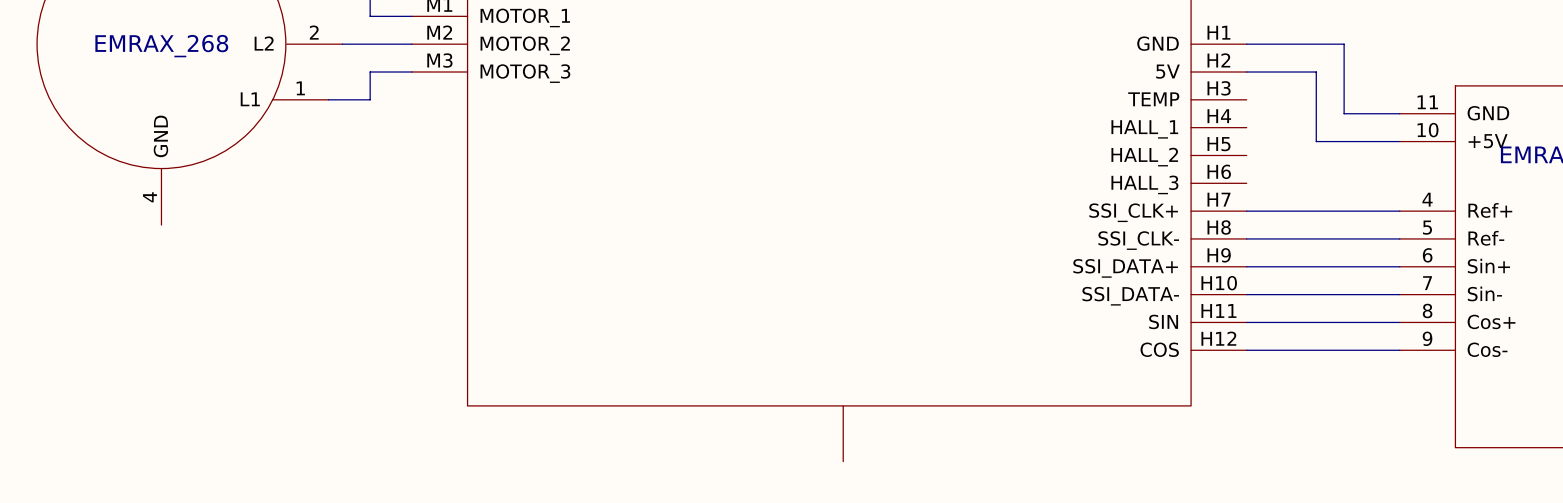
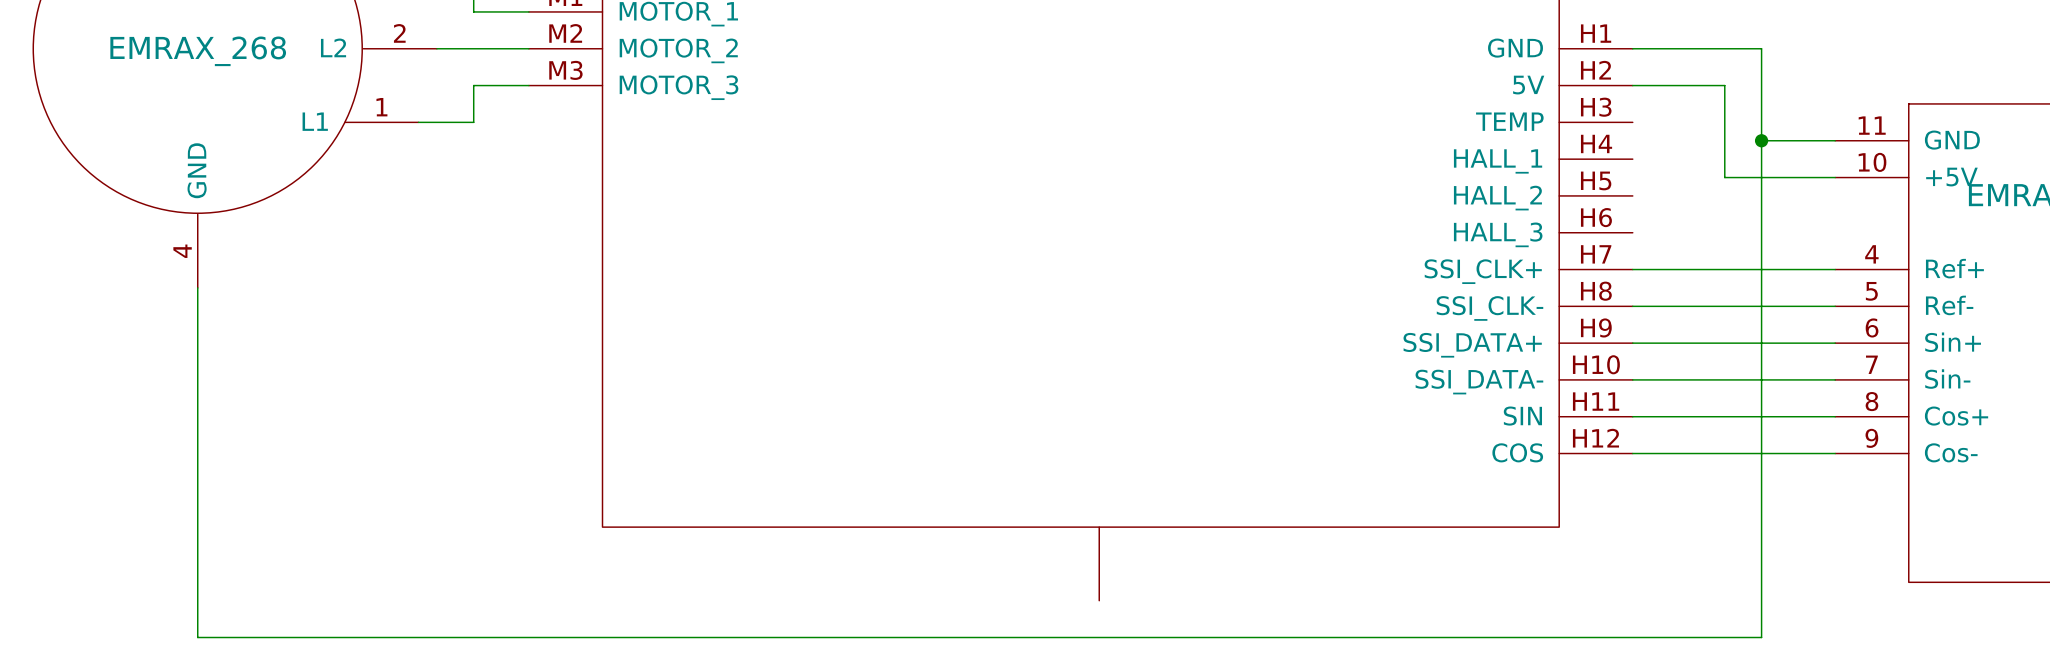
wire: none -> (1761, 140) (1761, 637) (197, 637) (197, 287)
junction: none -> (1761, 140)

